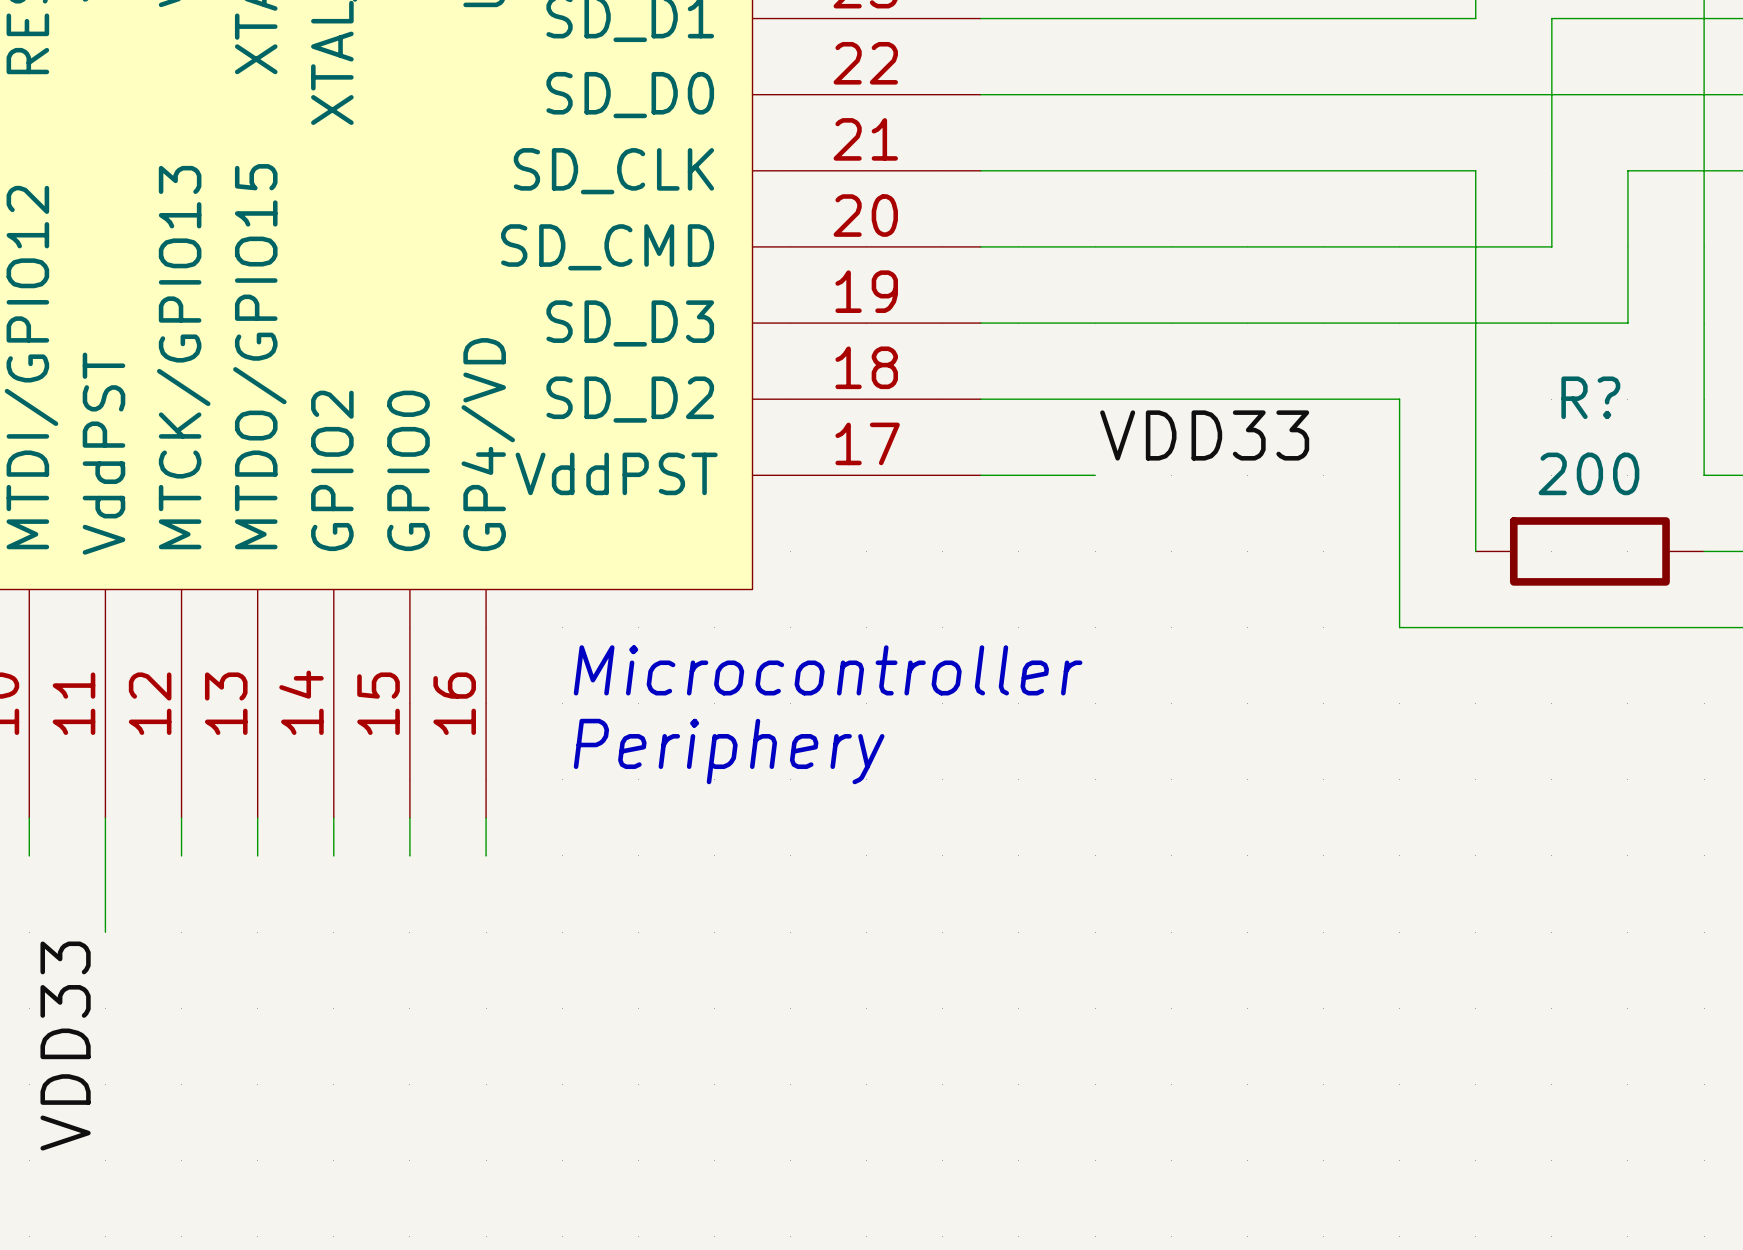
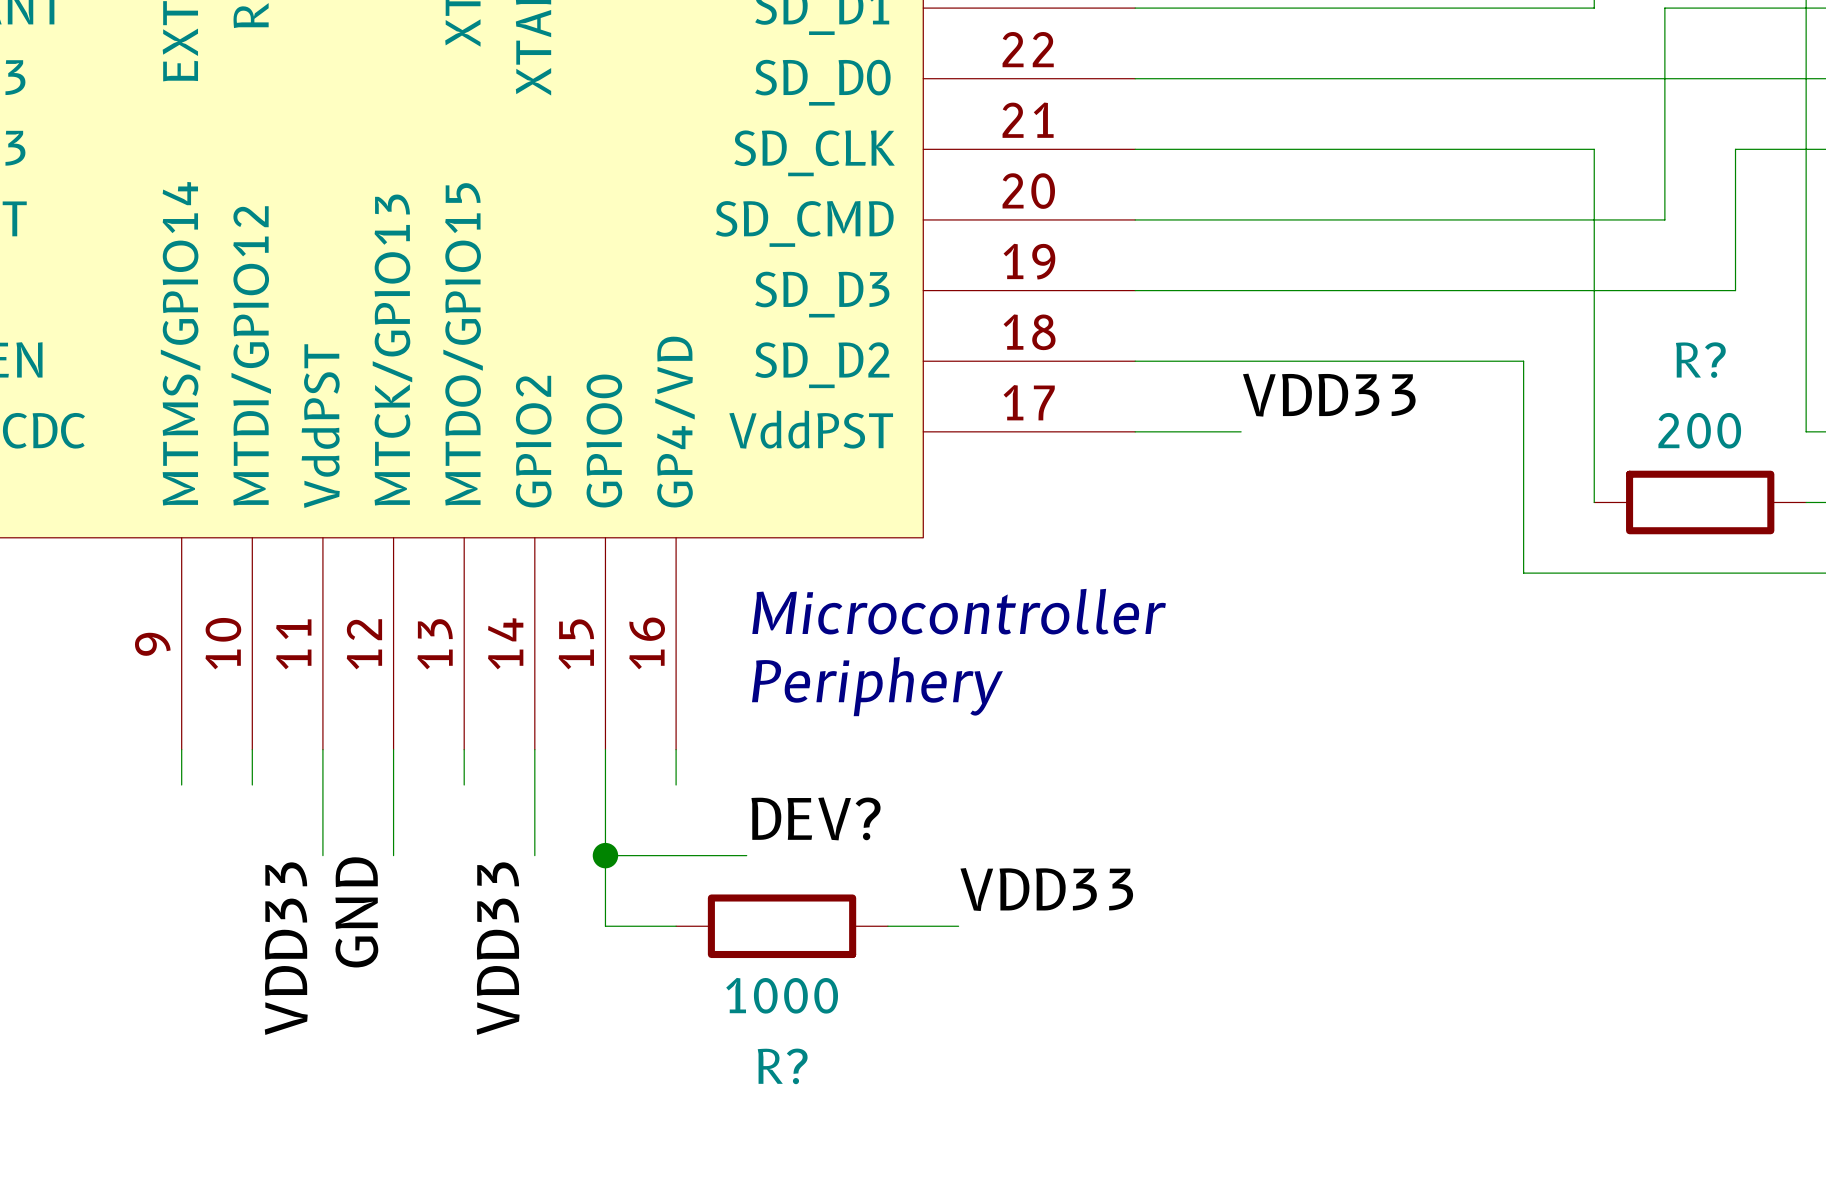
wire: none -> (393, 784) (393, 855)
wire: none -> (534, 784) (534, 855)
wire: none -> (605, 784) (605, 926) (676, 926)
label: none -> DEV? (815, 818)
wire: none -> (605, 855) (746, 855)
junction: none -> (605, 855)
label: none -> VDD33 (1046, 889)
label: none -> GND (356, 912)
R?: none -> 1000 (782, 926)
wire: none -> (887, 926) (958, 926)
label: none -> VDD33 (498, 948)

